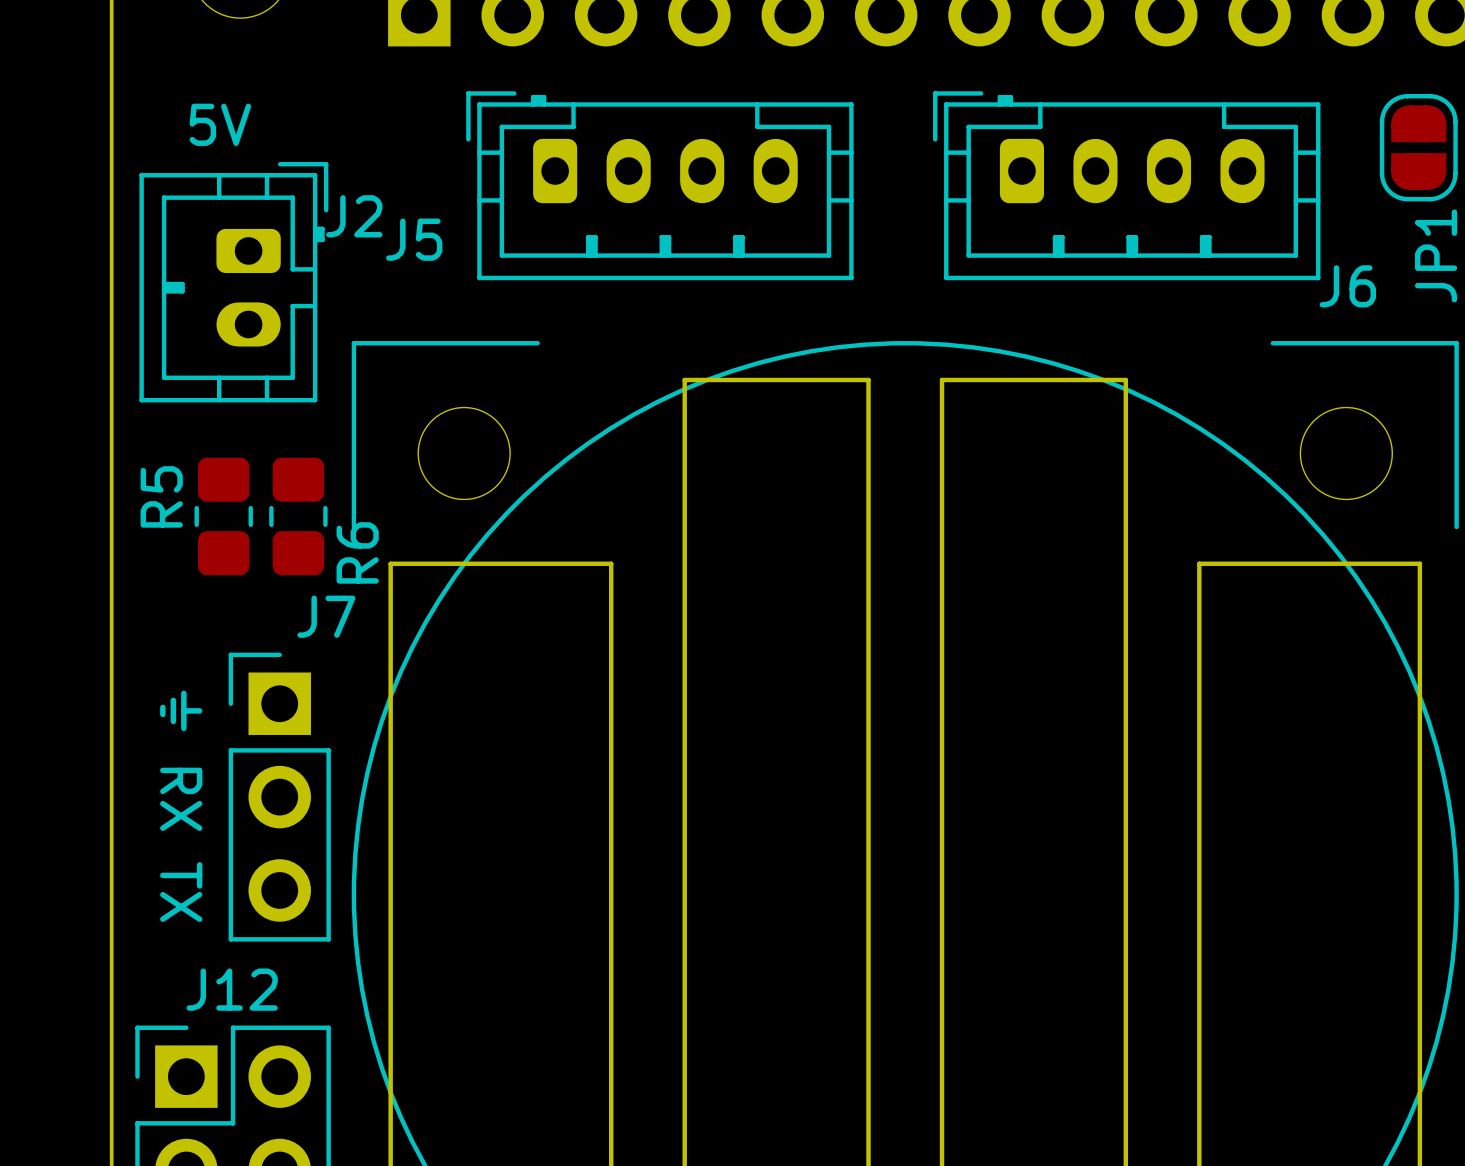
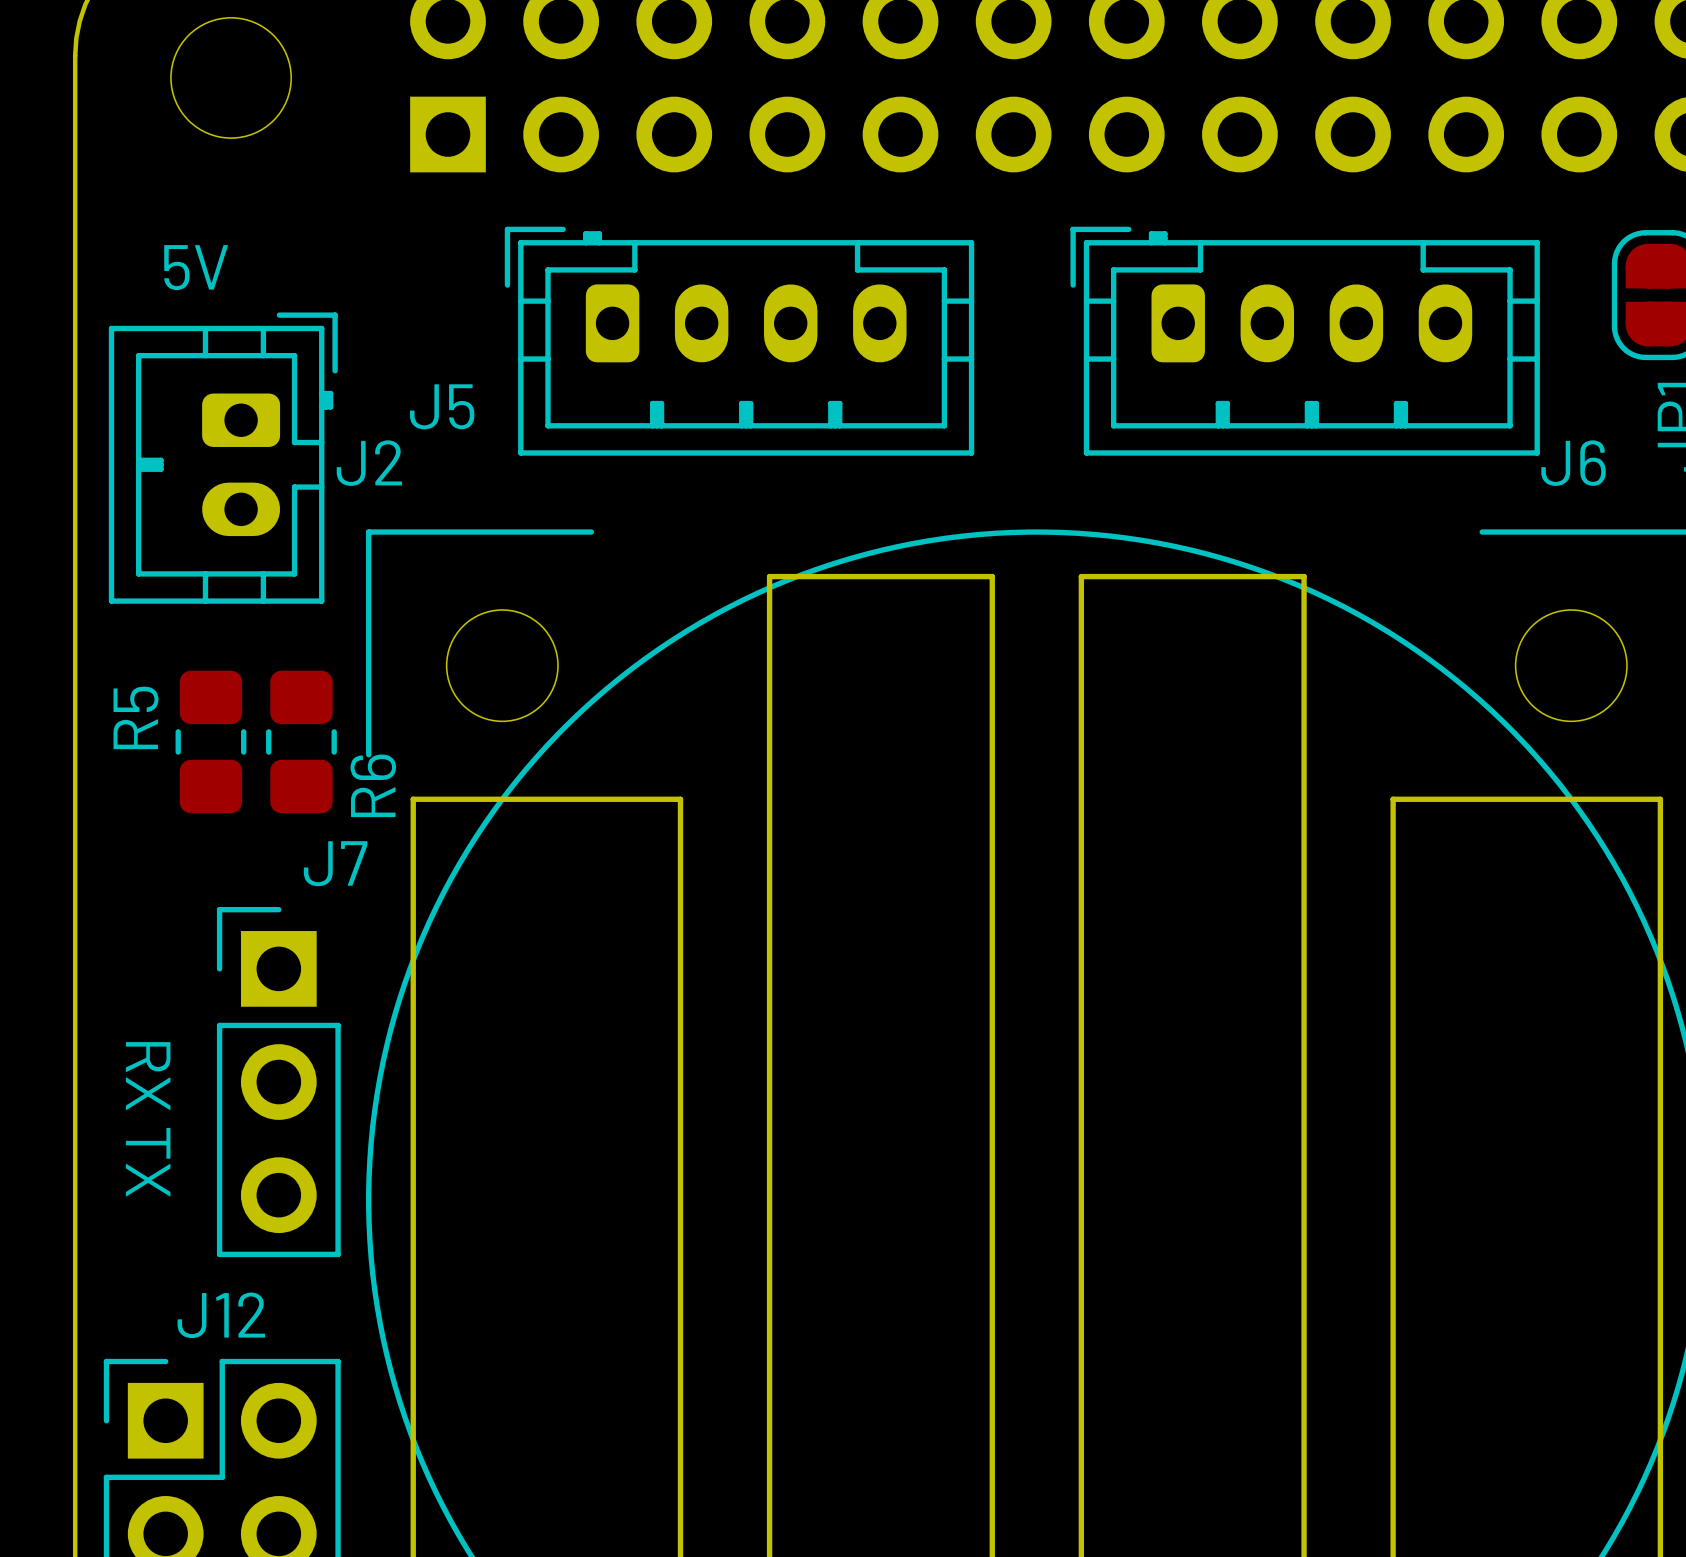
J2 name position: J2 (354, 216) -> J2 (369, 463)
text: ⏚ RX TX (181, 806) -> RX TX (148, 1119)

